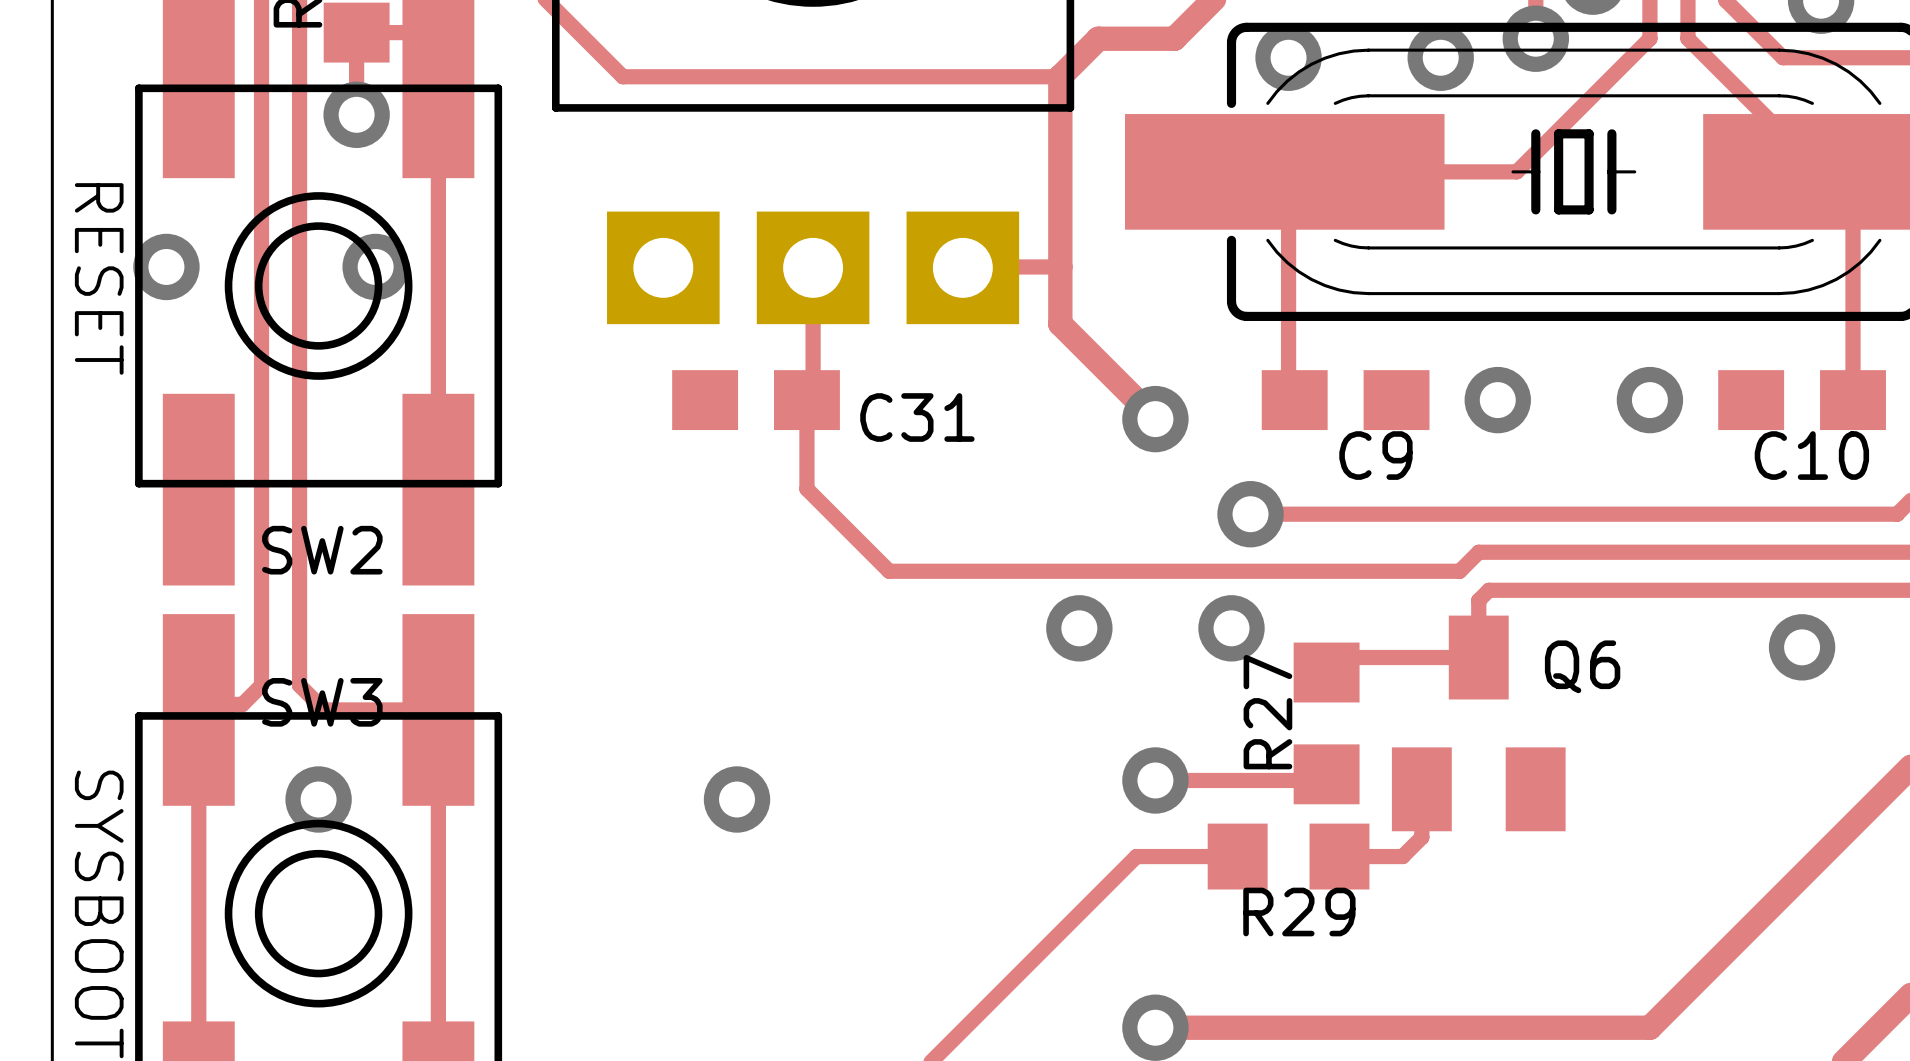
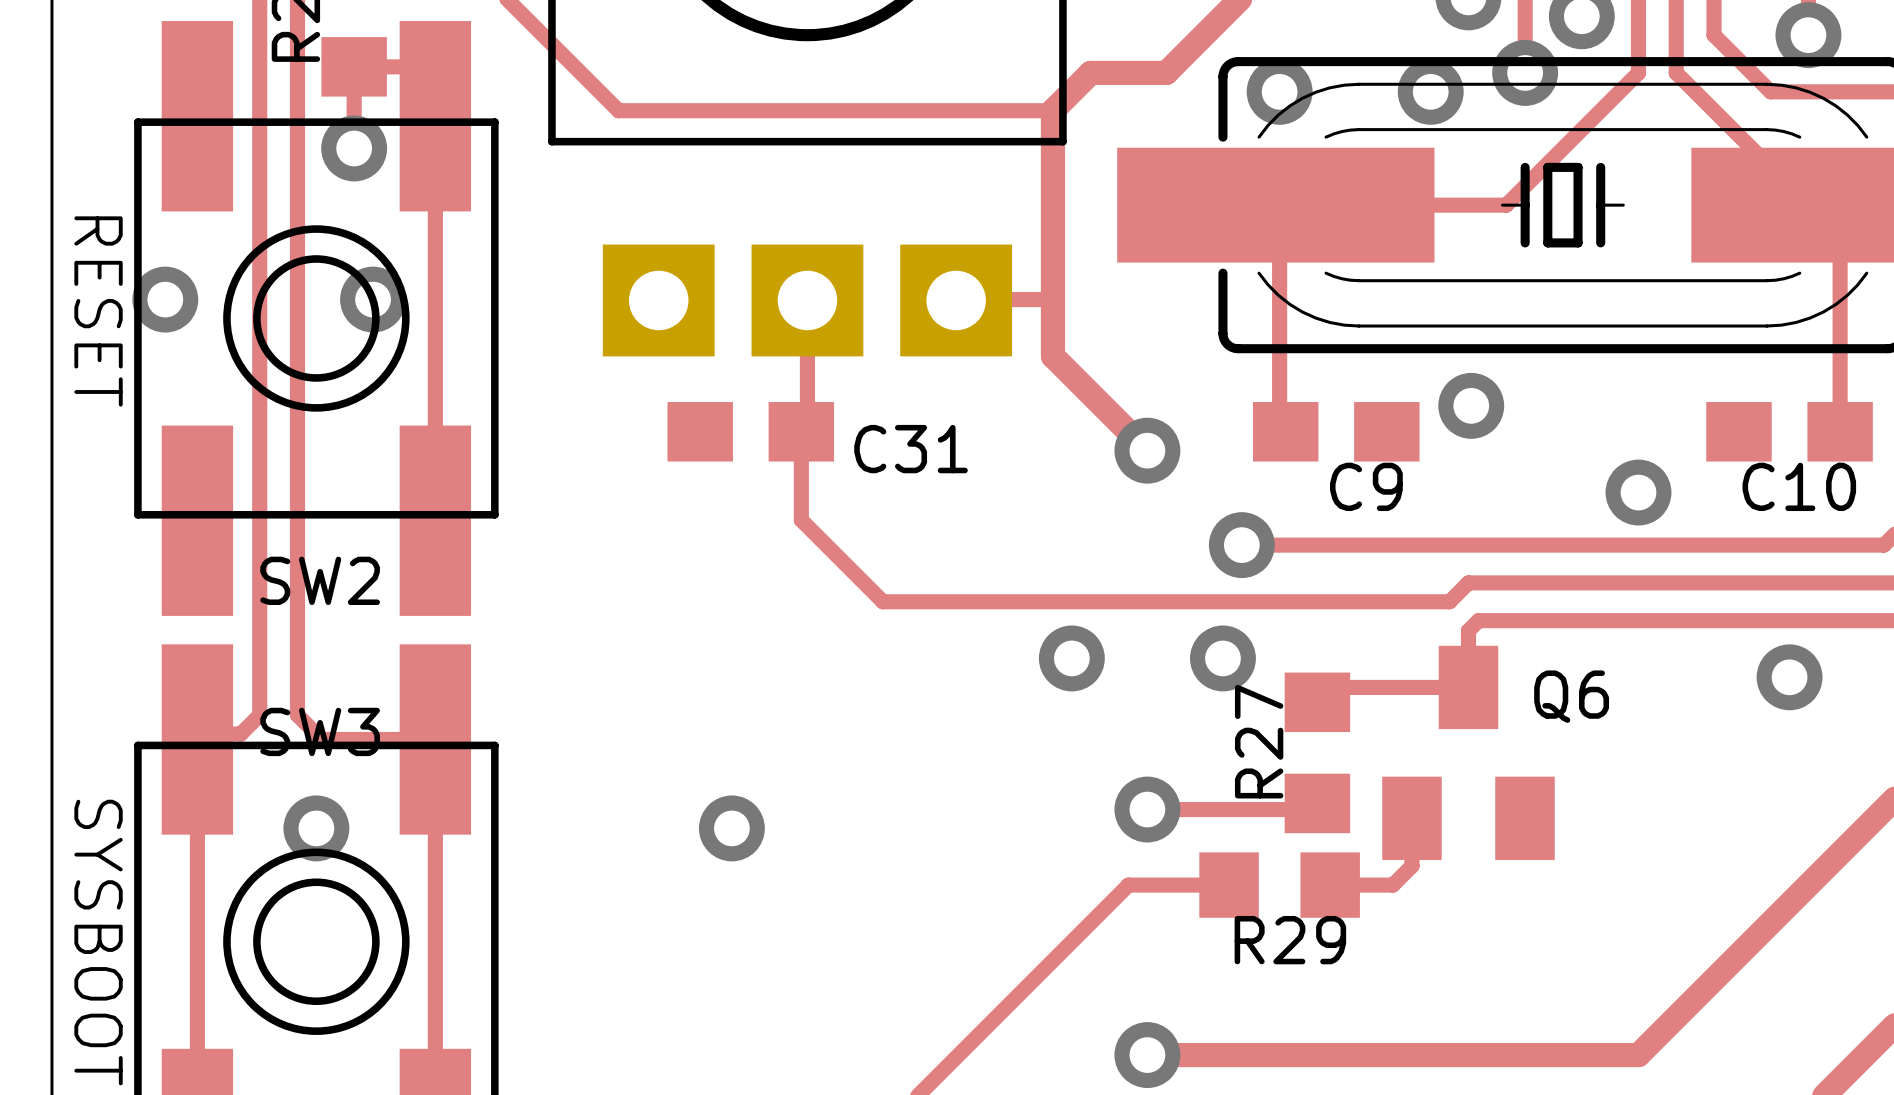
via position: (1497, 400) -> (1471, 405)
via position: (1649, 400) -> (1638, 492)

